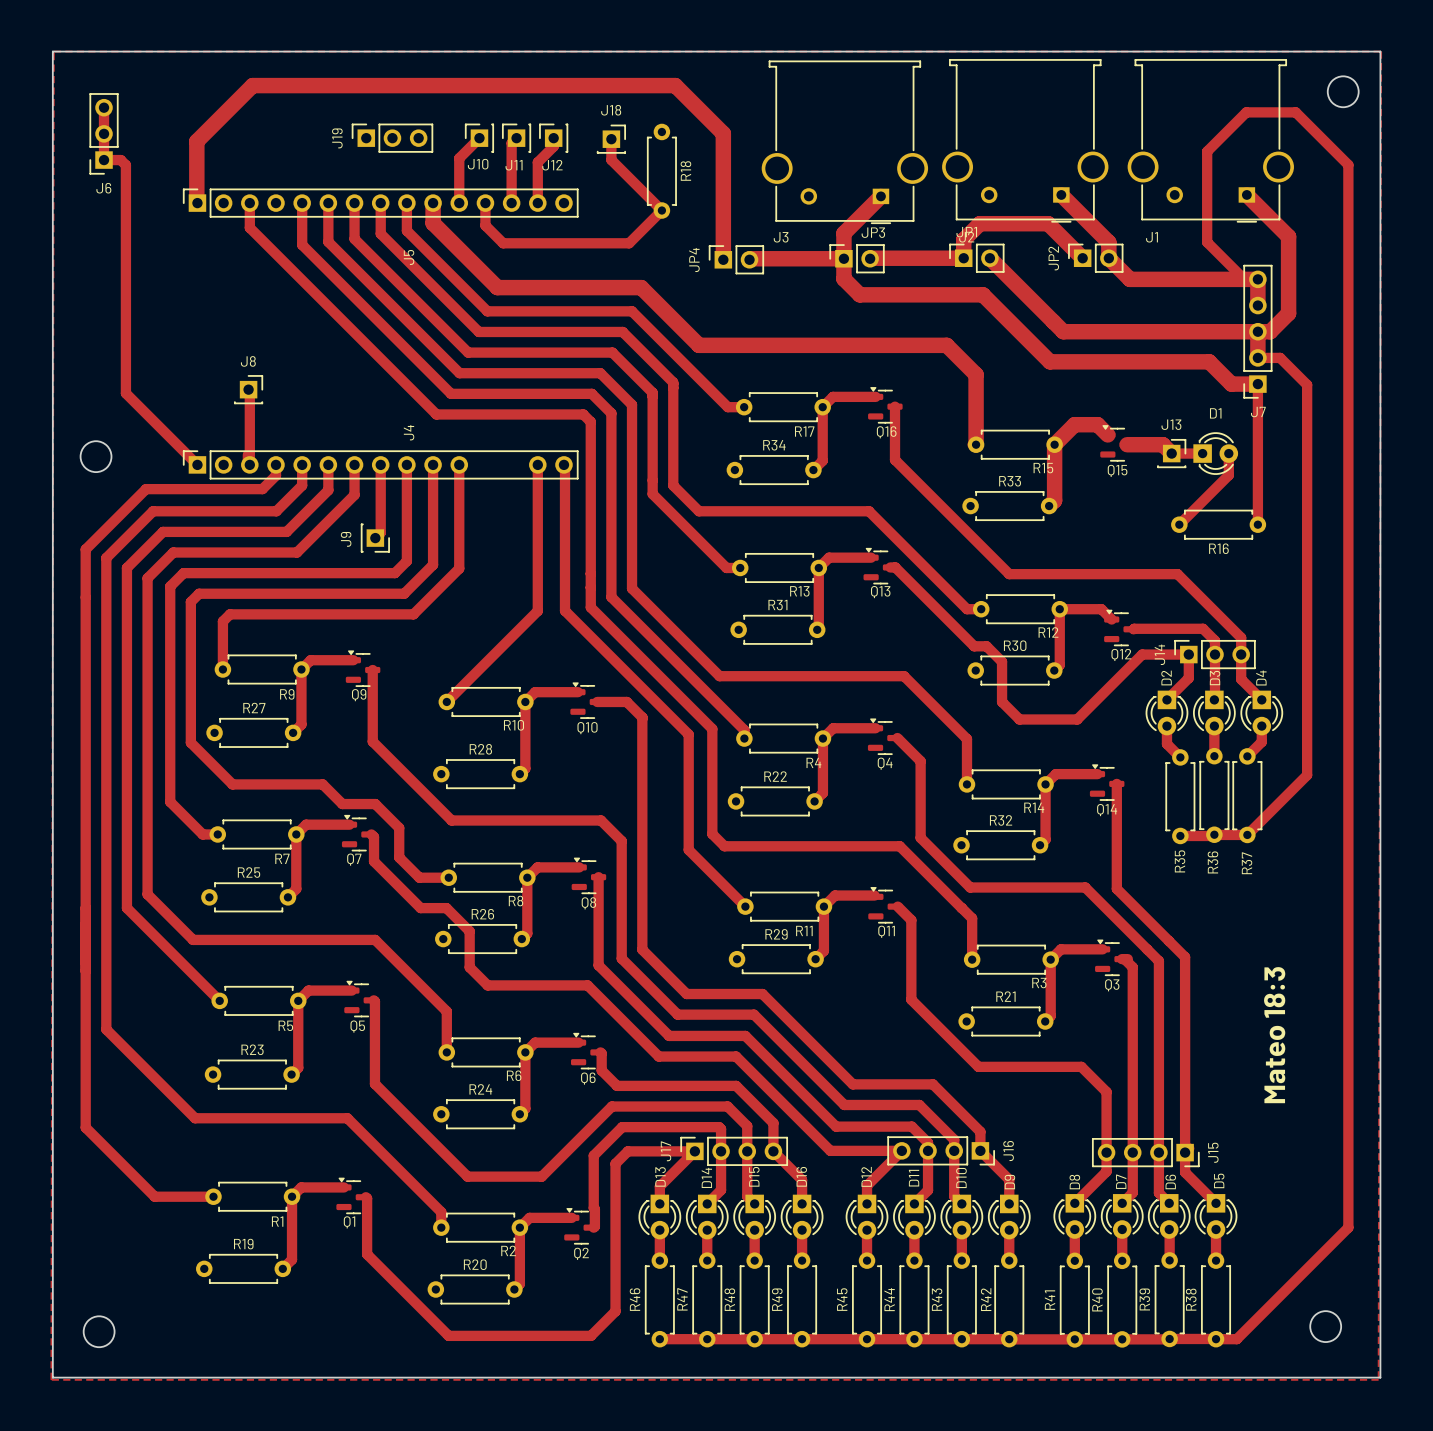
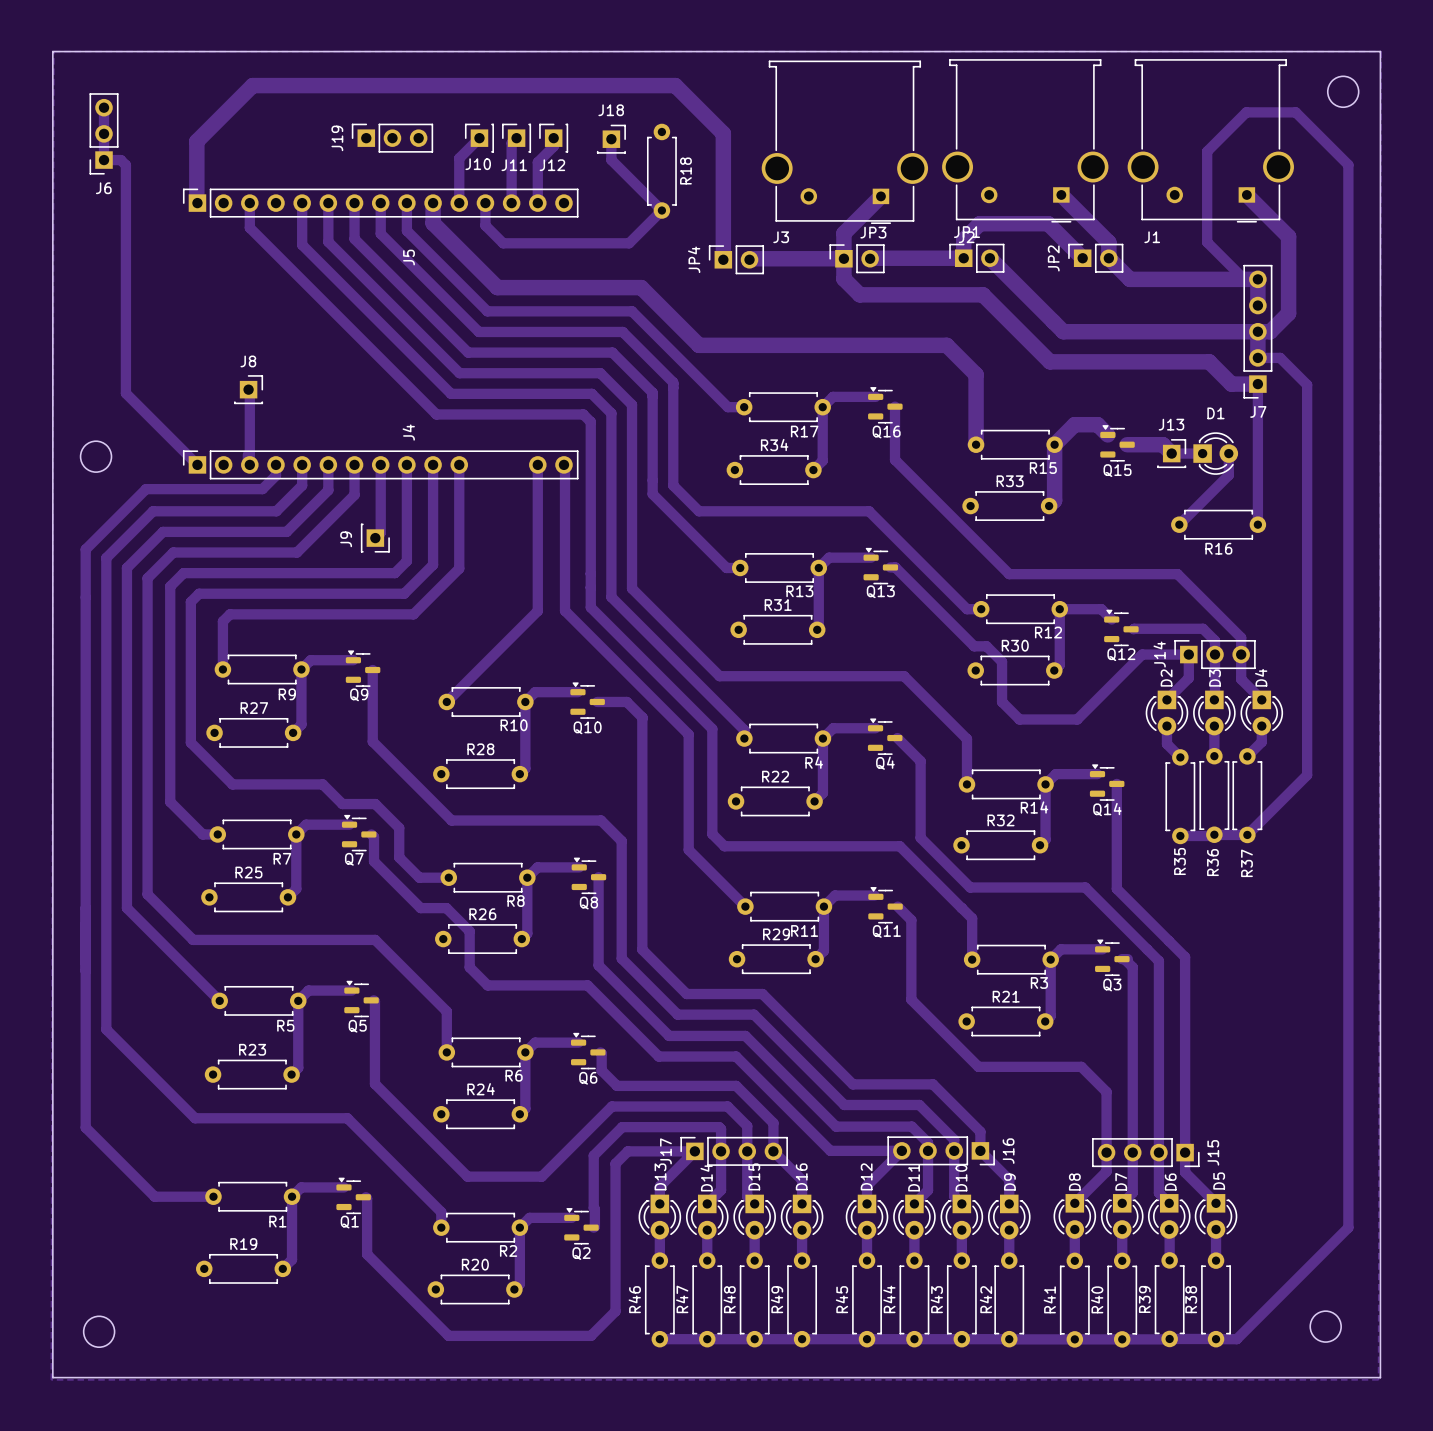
text: Mateo 18:3 (1274, 1035) -> none

